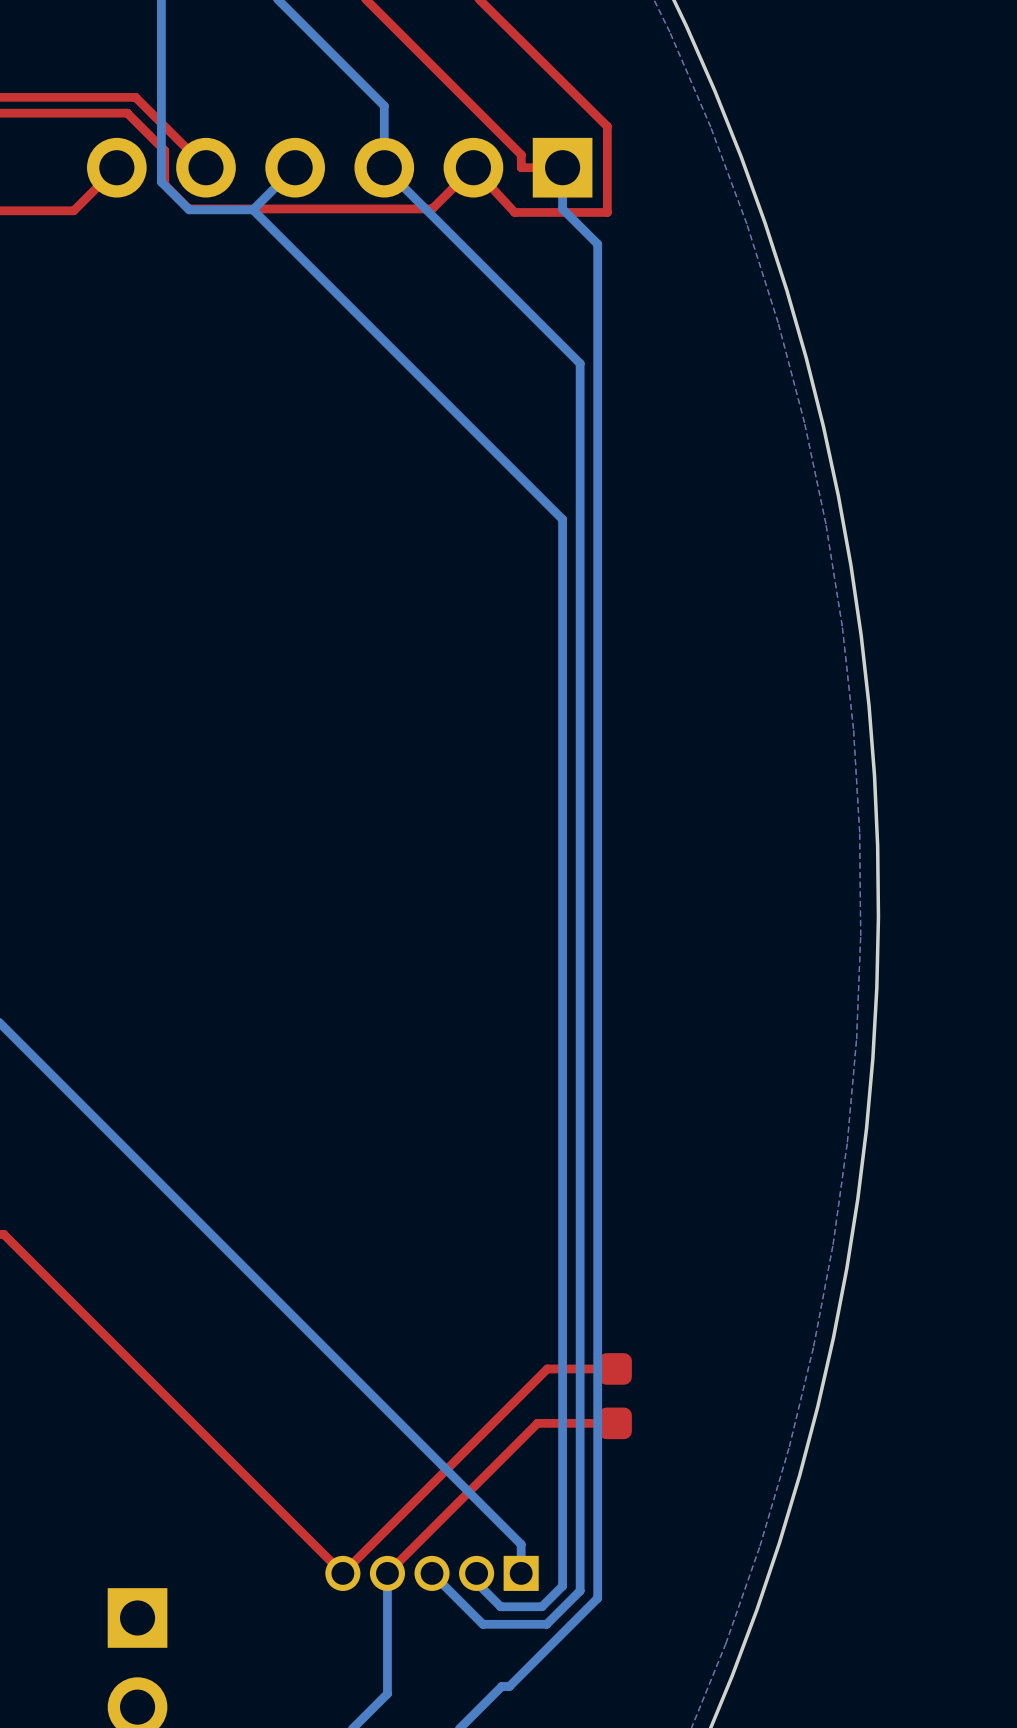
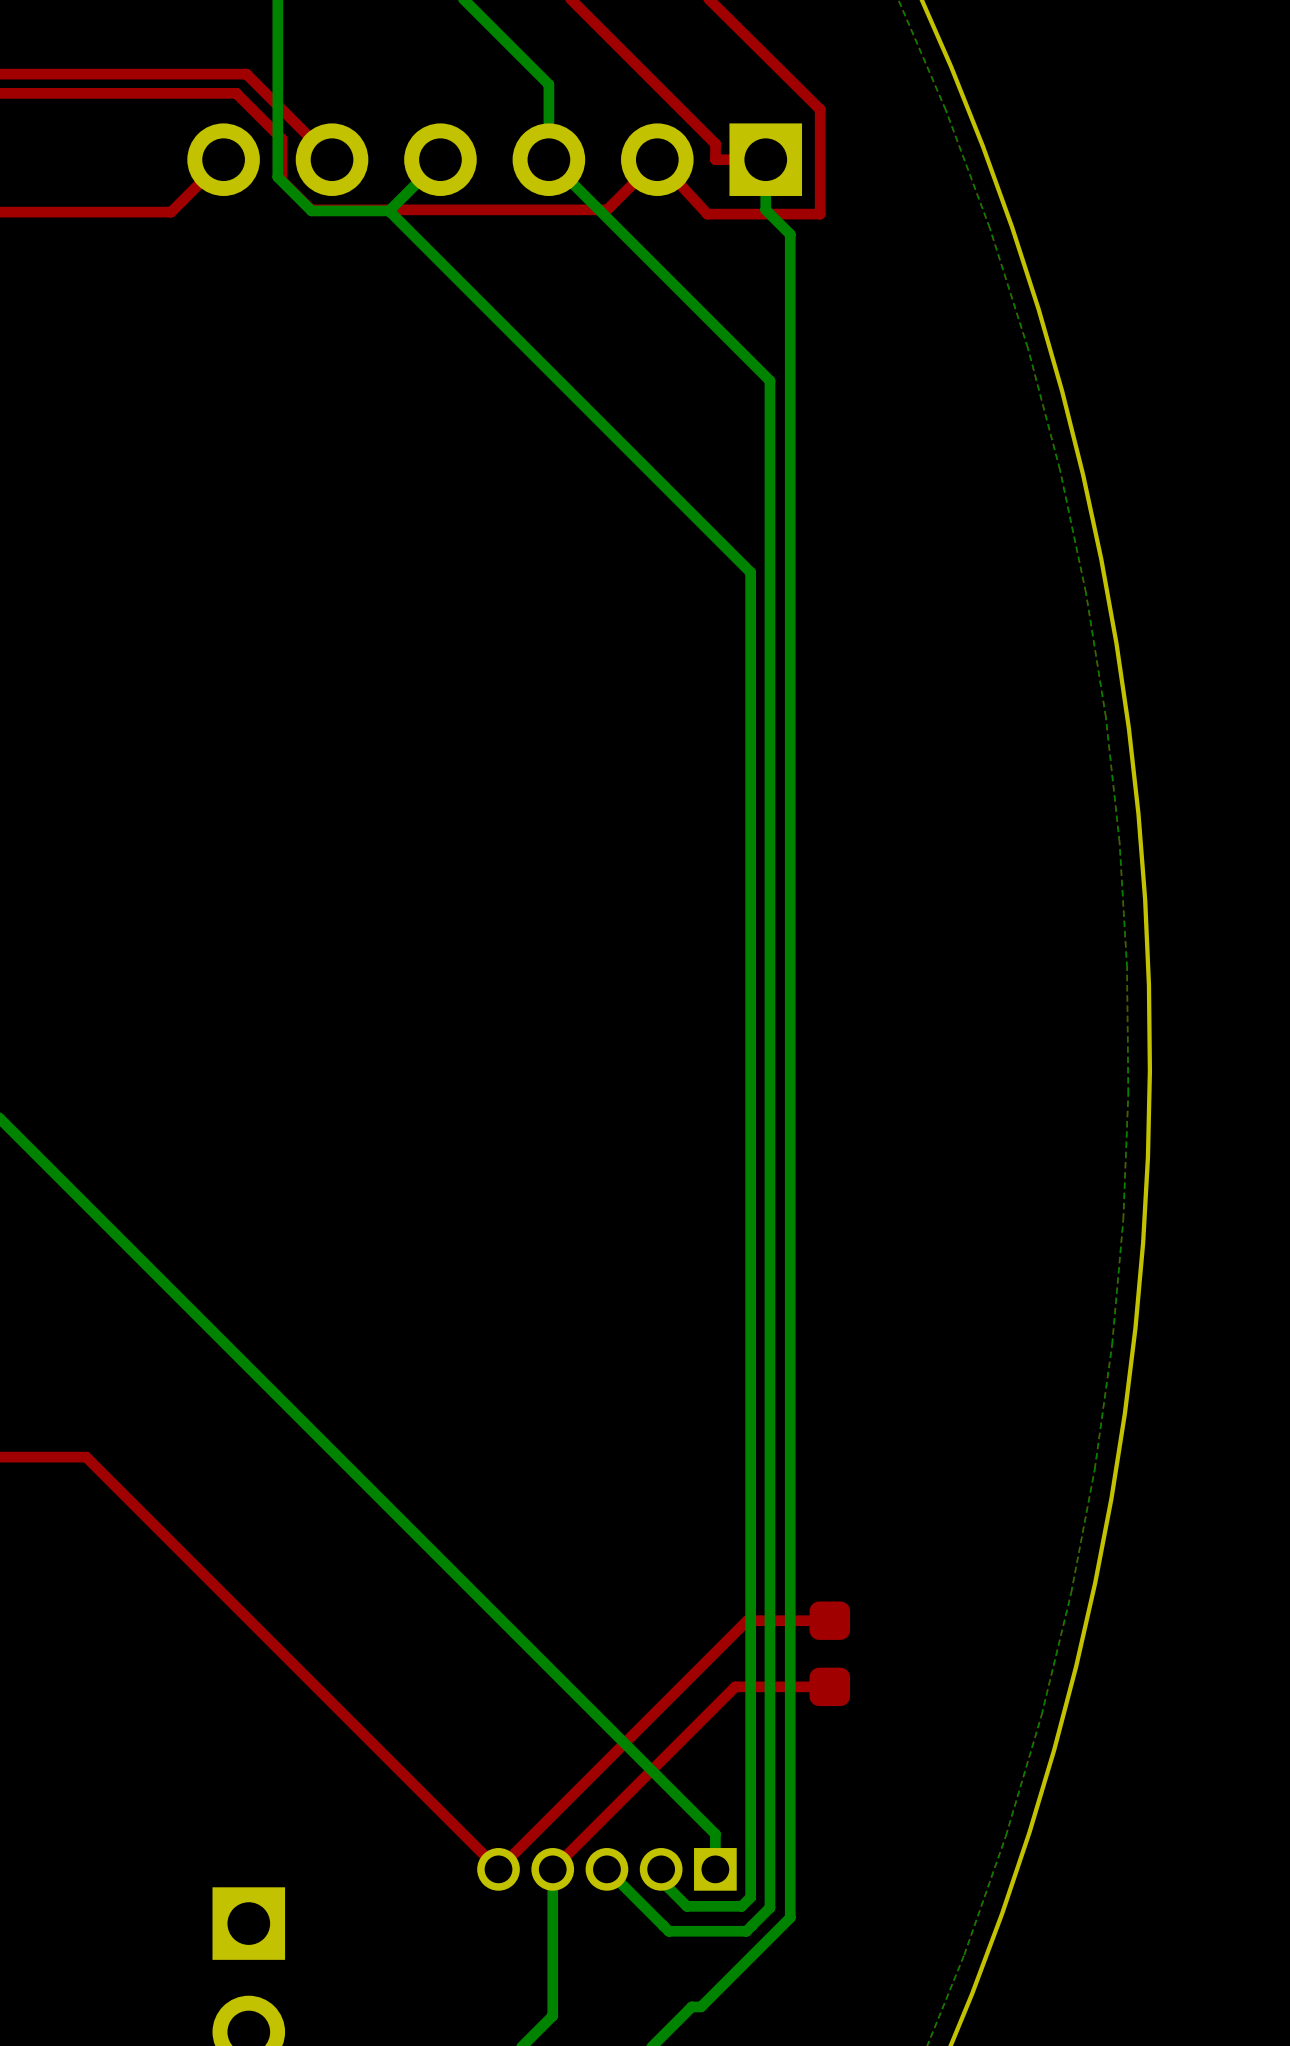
bottom track: (582, 229) (597, 244) (597, 1598) (582, 1613) -> (790, 234) (790, 1917)
bottom track: (566, 349) (580, 363) (580, 1590) (566, 1604) -> (769, 380) (769, 1907)
bottom track: (550, 507) (562, 519) (562, 1586) (541, 1606) (500, 1606) (497, 1603) -> (750, 572) (750, 1897) (741, 1906) (686, 1906)

